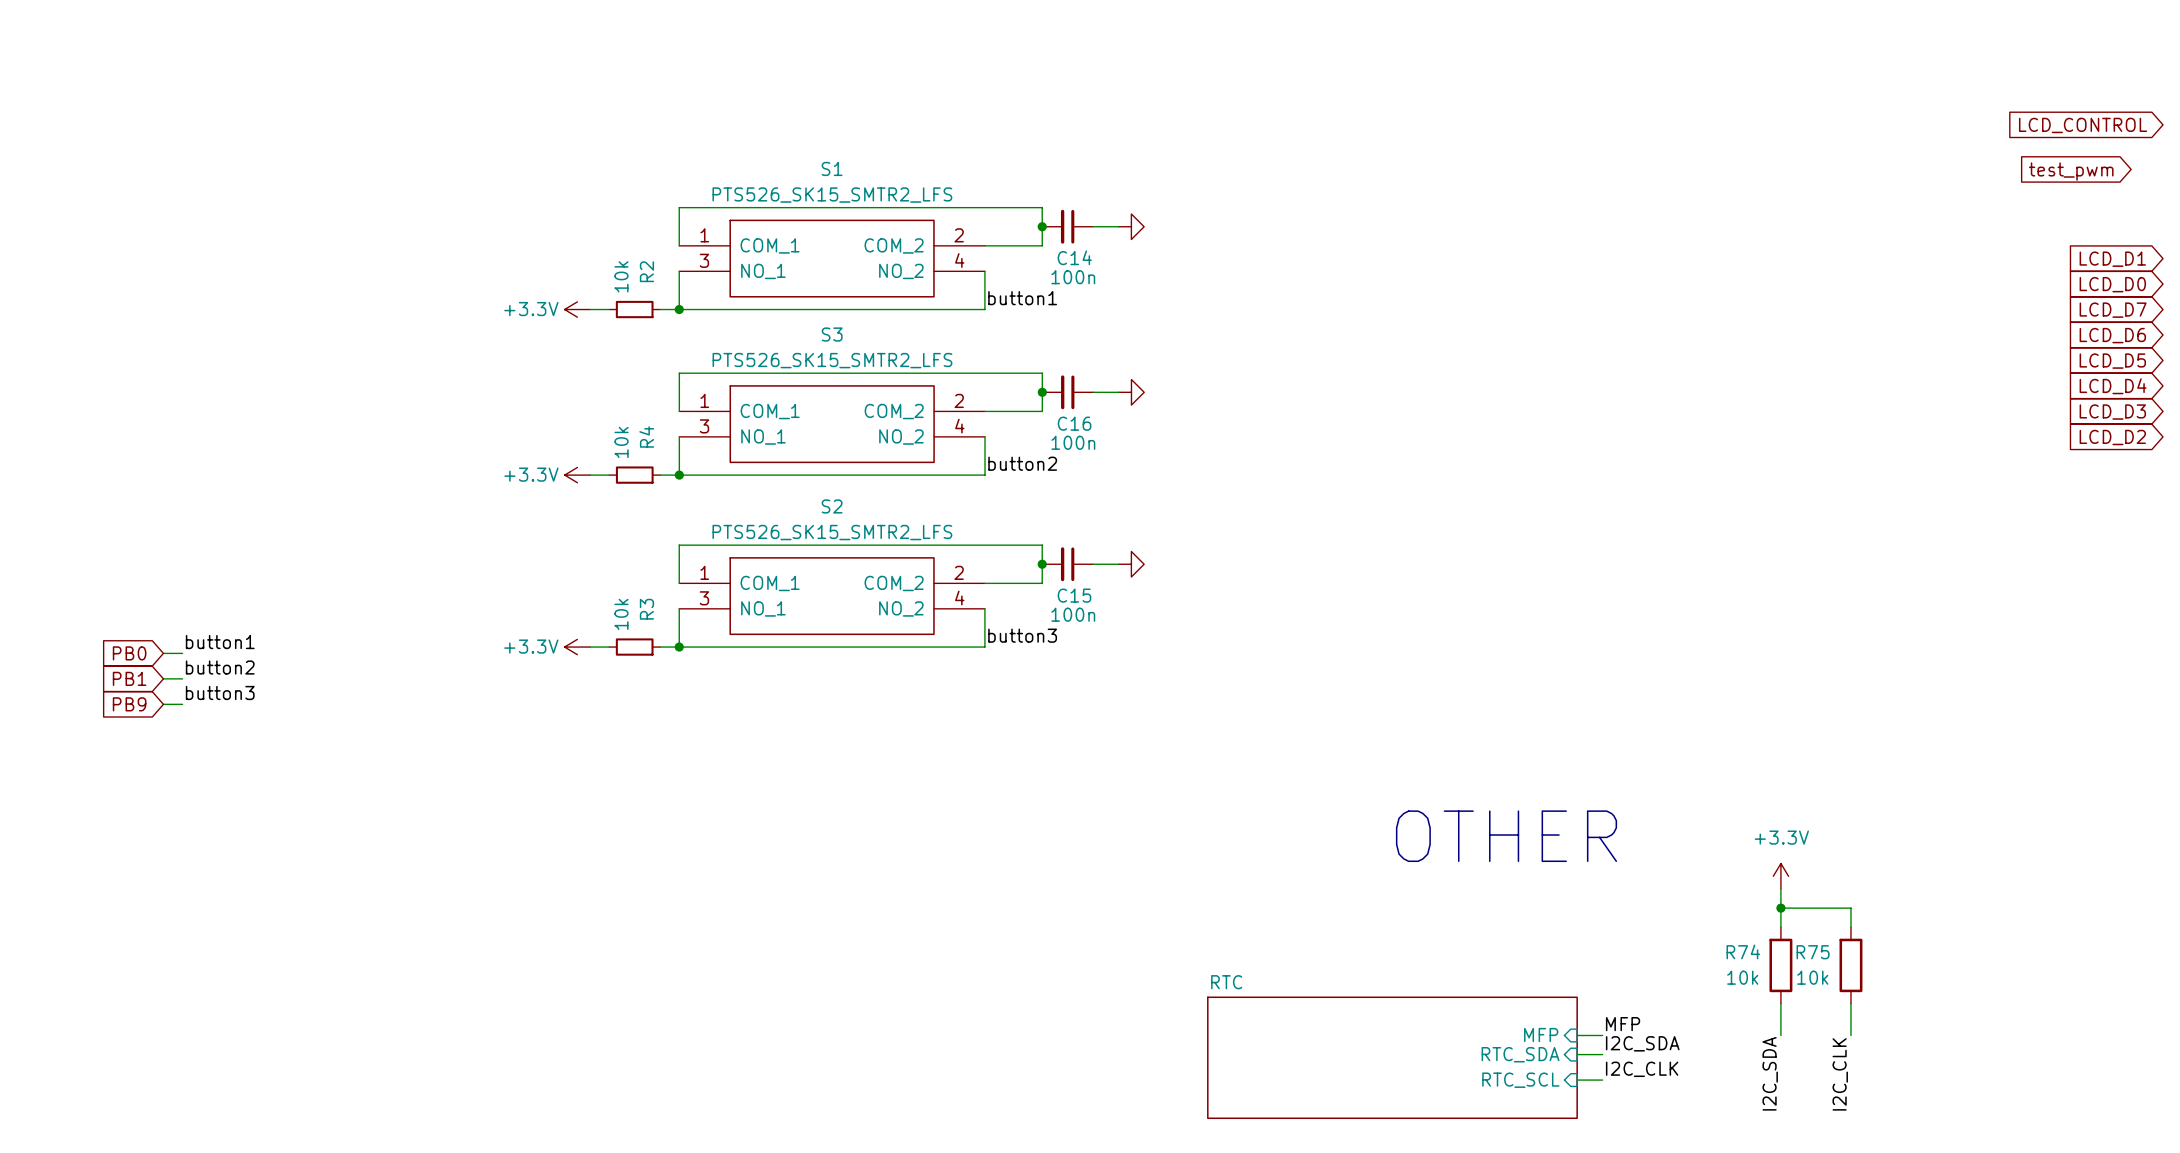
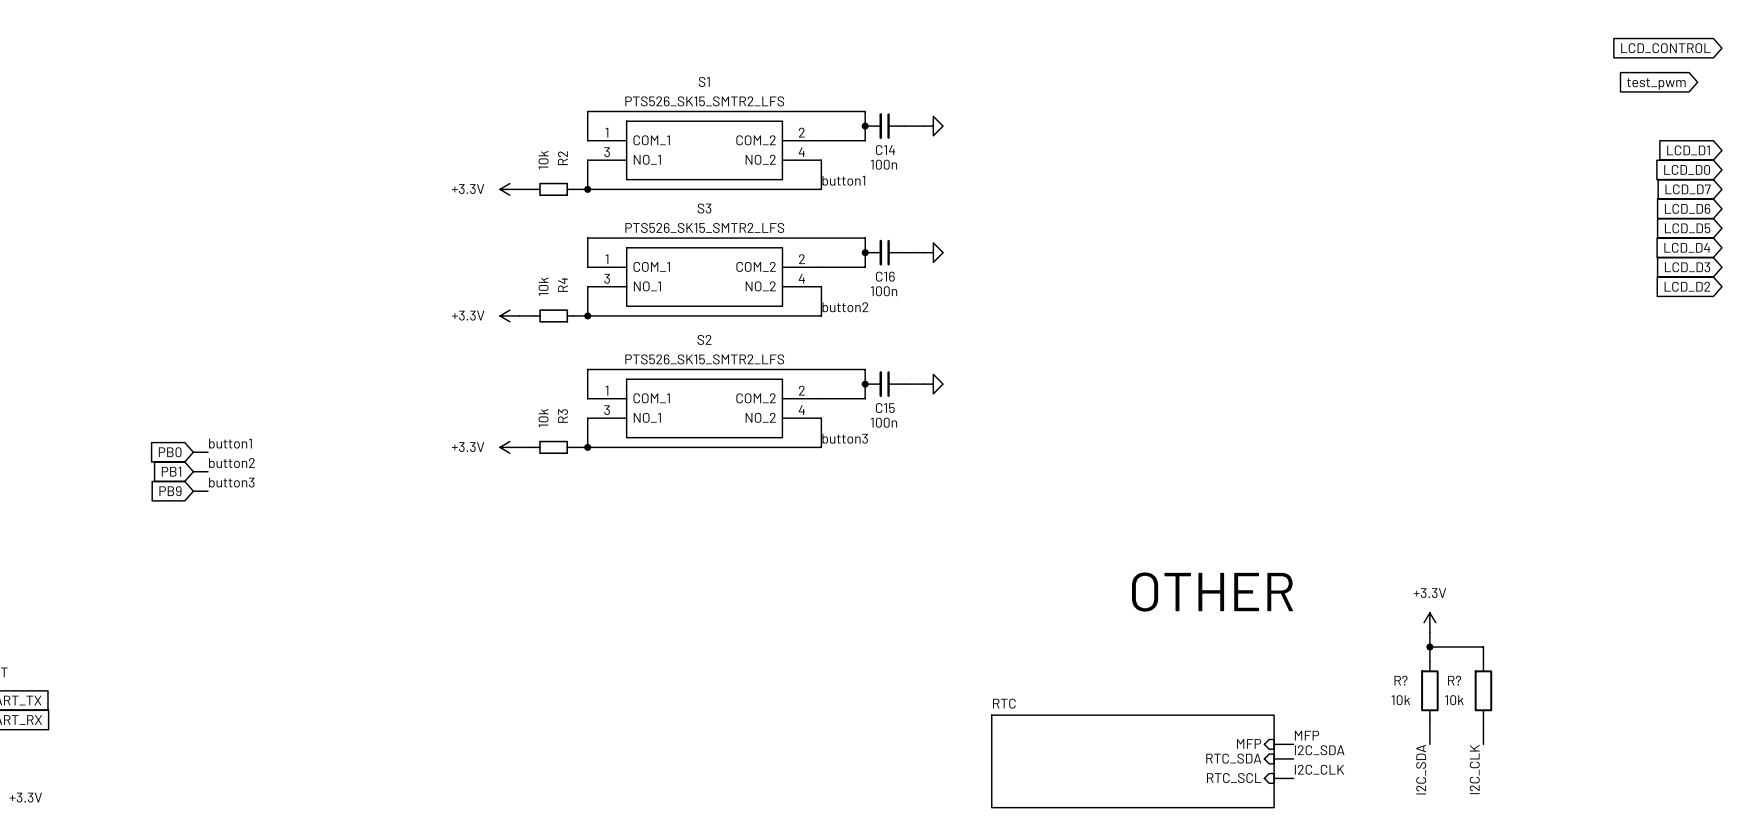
R74 name: R74 (1743, 951) -> R? (1401, 680)
R75 name: R75 (1813, 952) -> R? (1454, 680)

